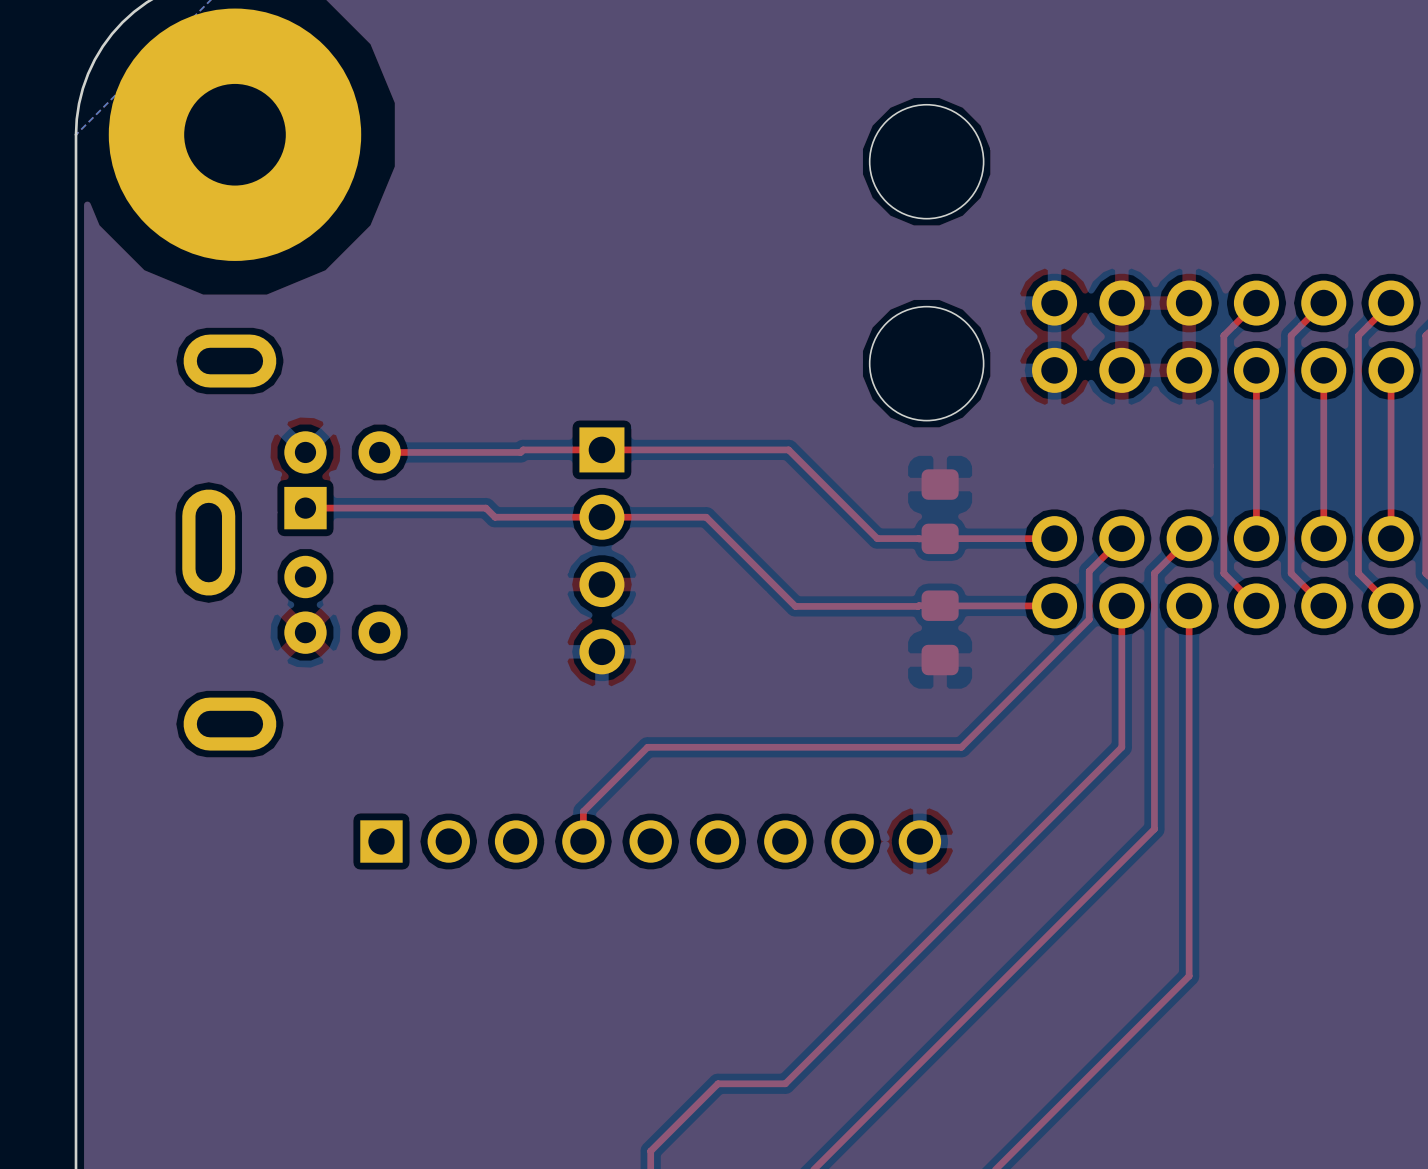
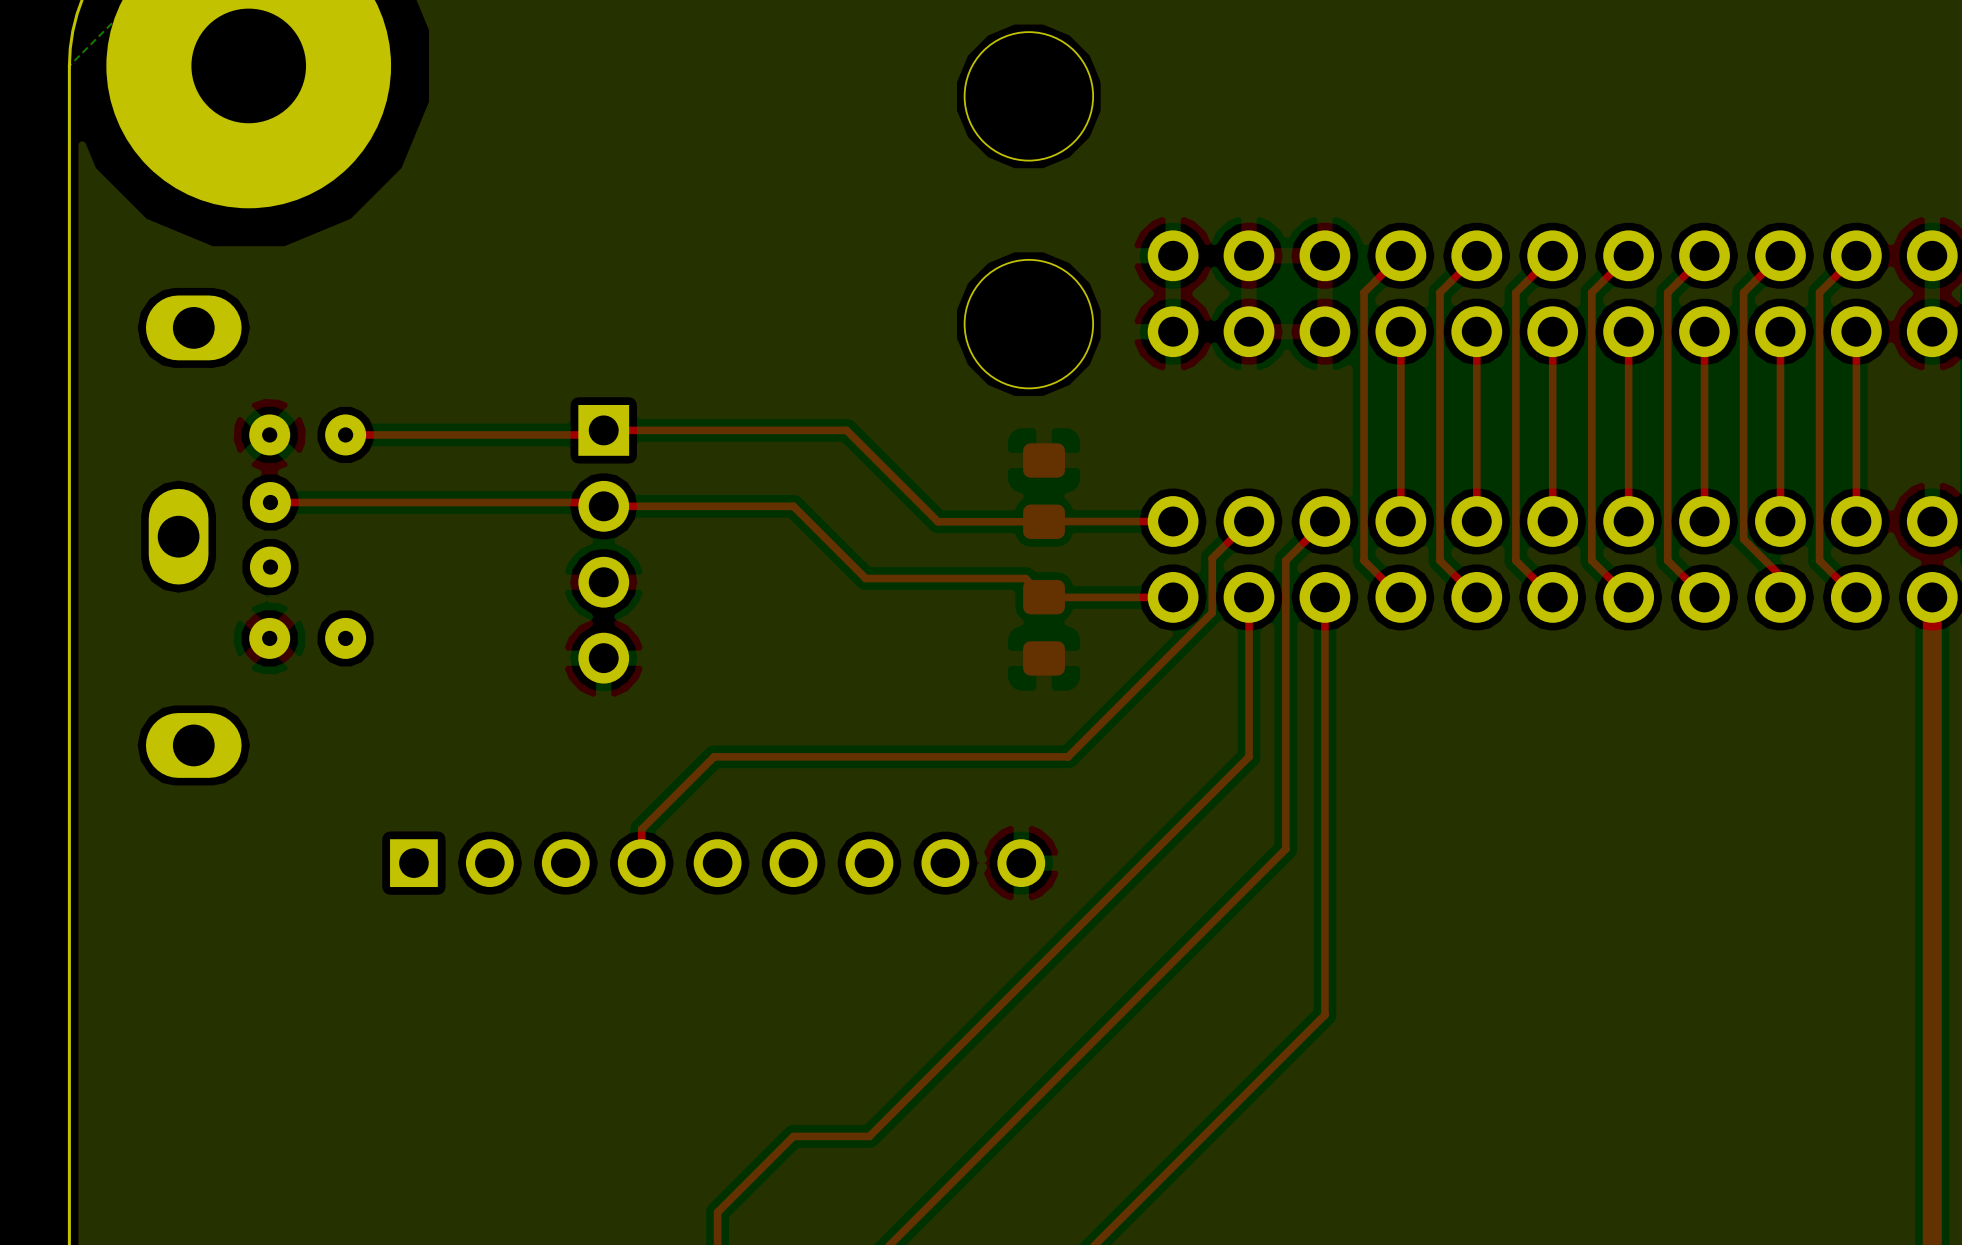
top track: (379, 452) (520, 452) (523, 449) (788, 449) (877, 538) (918, 538) -> (345, 434) (599, 434) (603, 430) (846, 430) (938, 521) (1020, 521)
top track: (305, 508) (485, 508) (495, 517) (706, 517) (795, 606) (940, 605) -> (270, 502) (599, 502) (603, 506) (793, 506) (865, 578) (1025, 578) (1044, 597)
part: (291, 542) -> none
part position: (601, 550) -> (603, 544)
part: none -> (256, 536)

